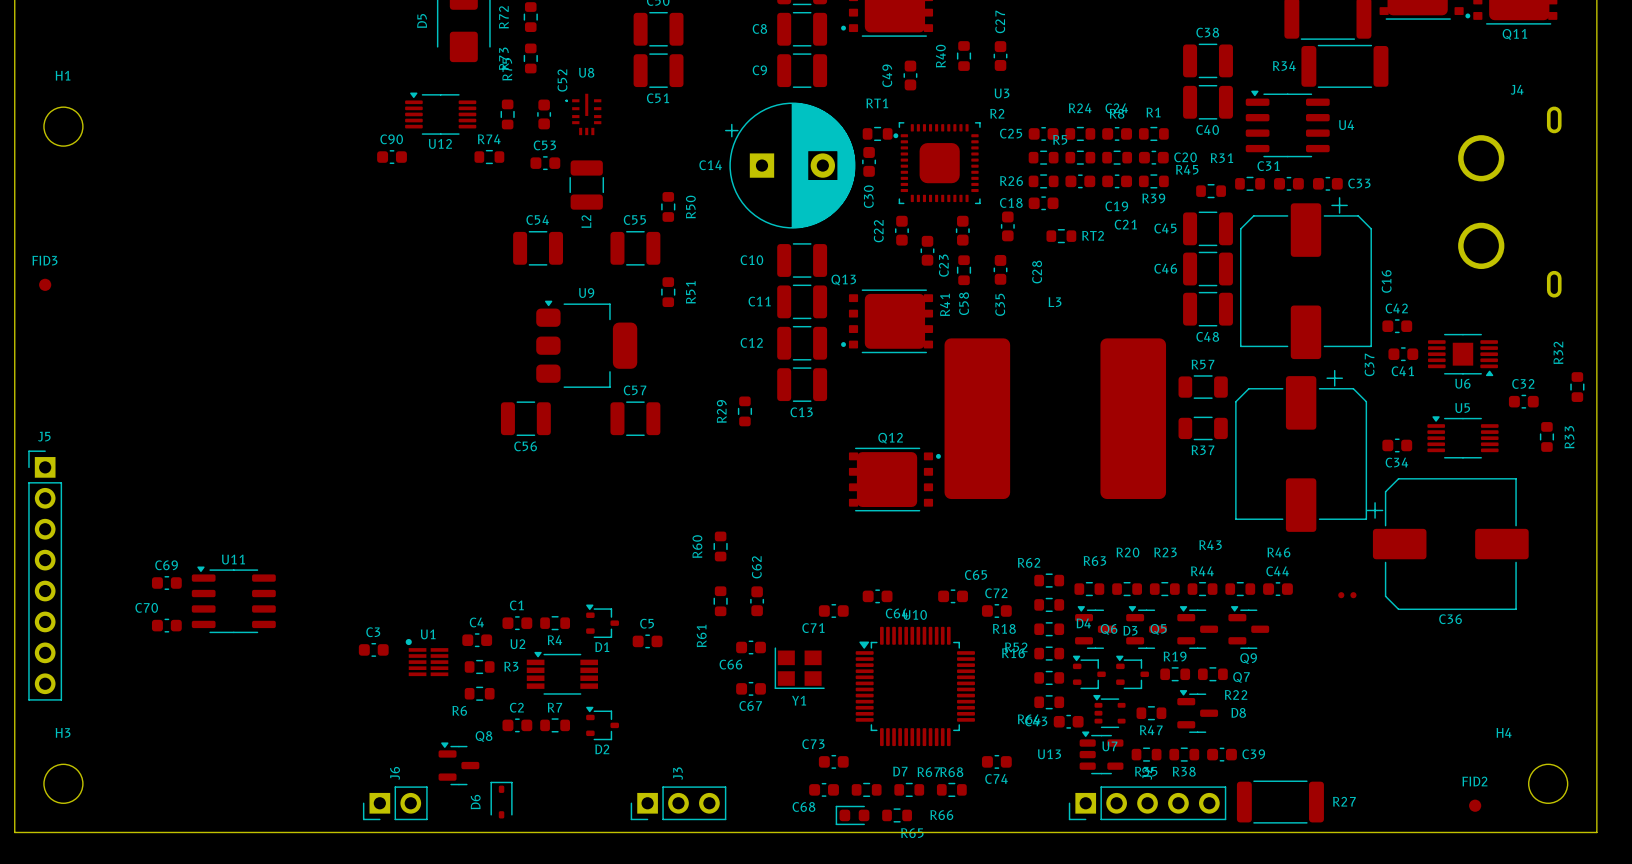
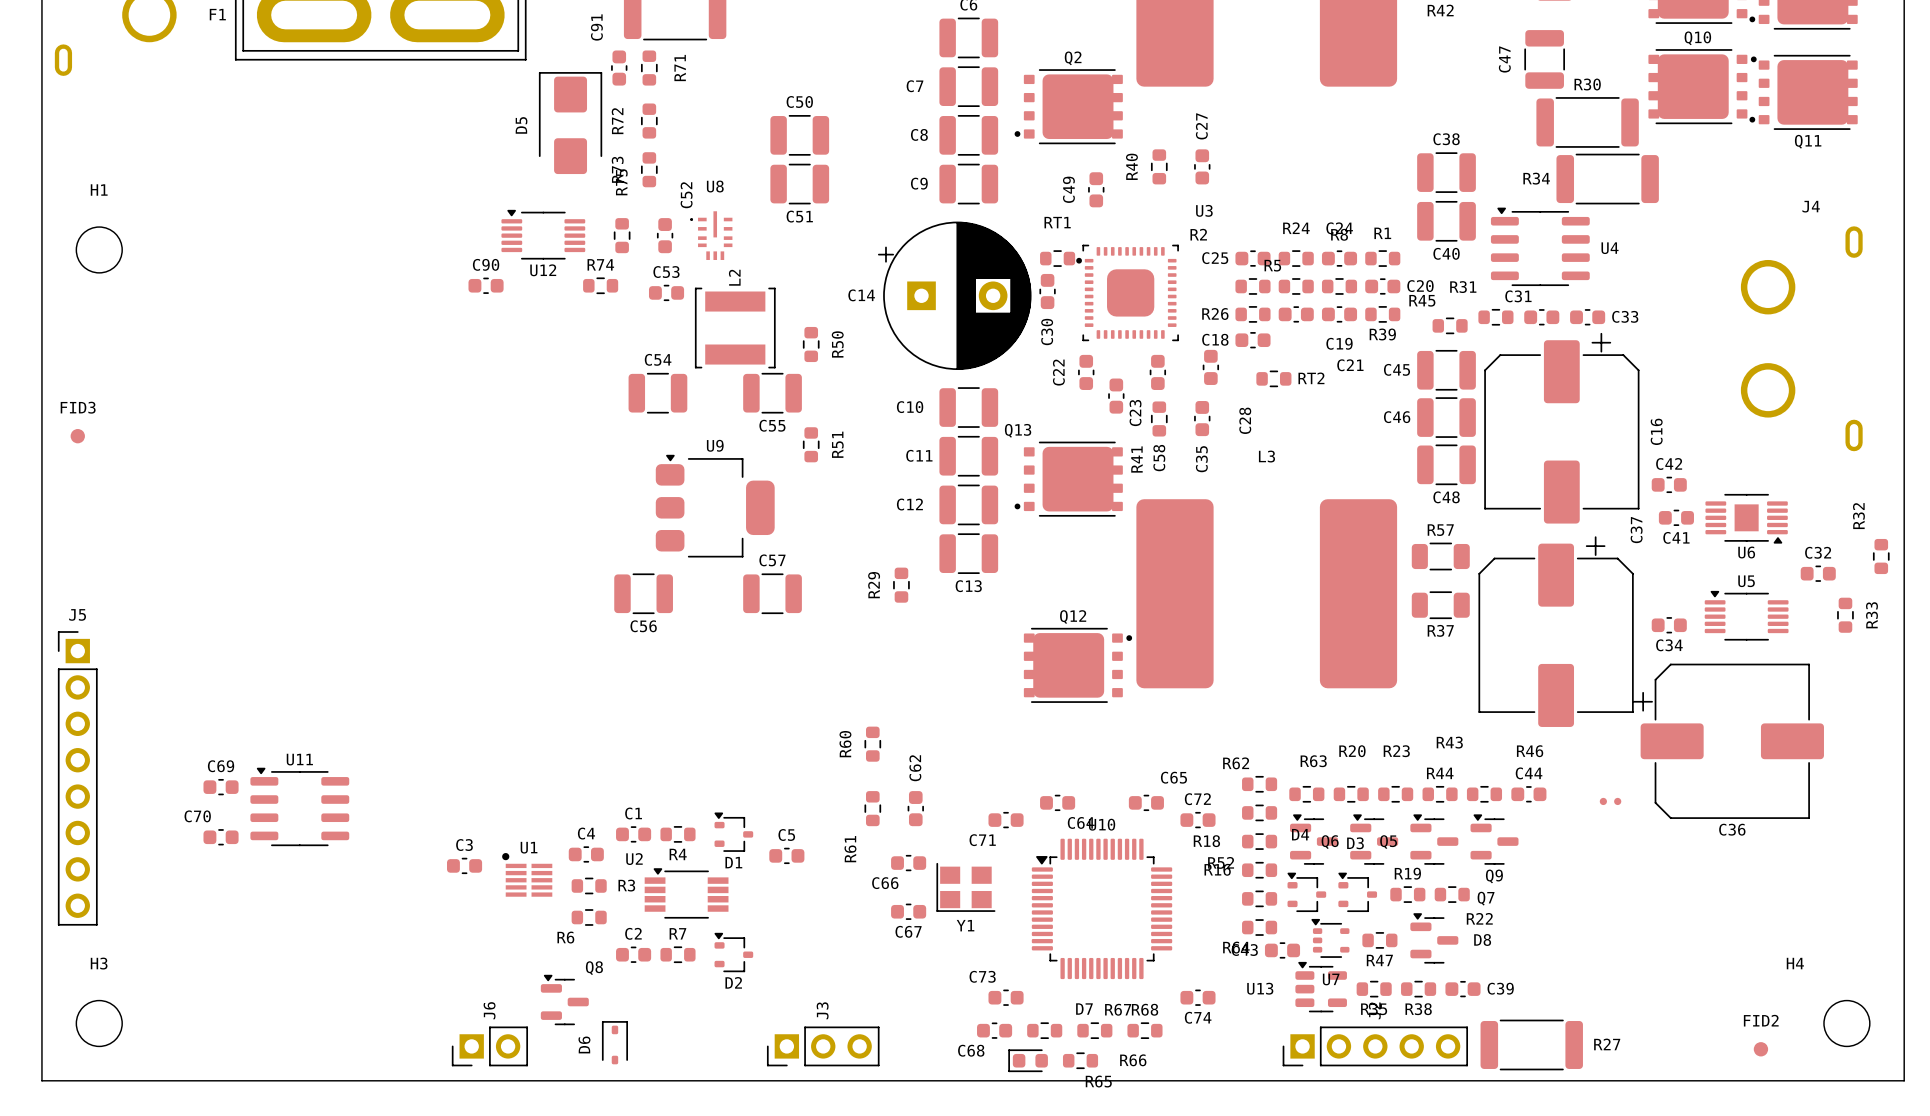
L2 footprint: [569, 160, 605, 210] -> [694, 287, 776, 369]
C55 name position: C55 (634, 220) -> C55 (772, 425)
L2 name position: L2 (586, 221) -> L2 (734, 277)

